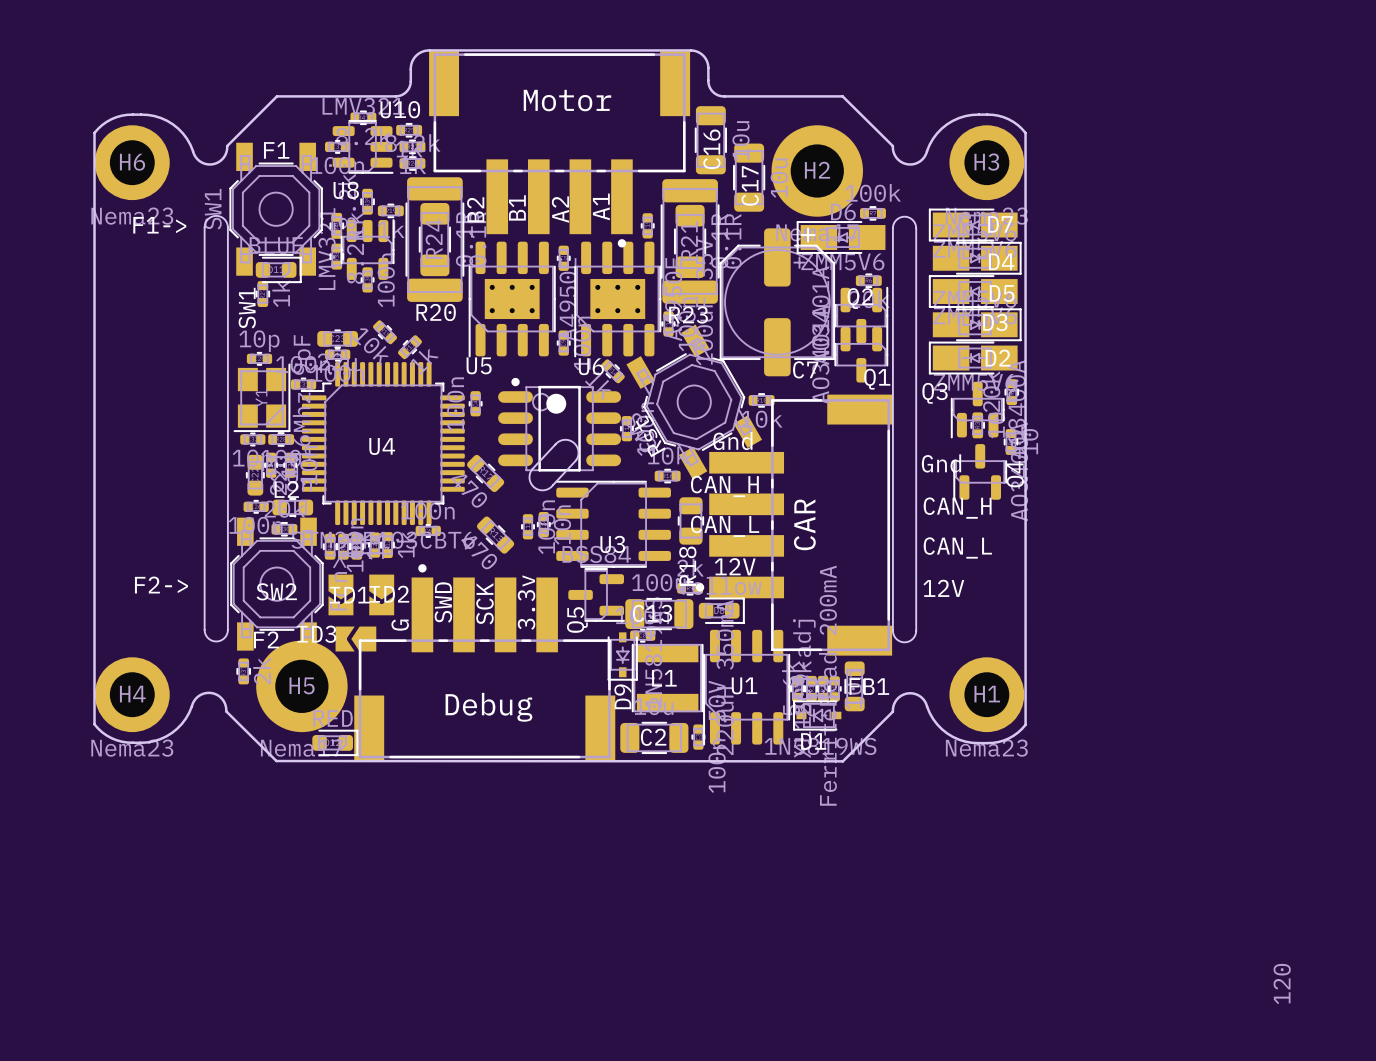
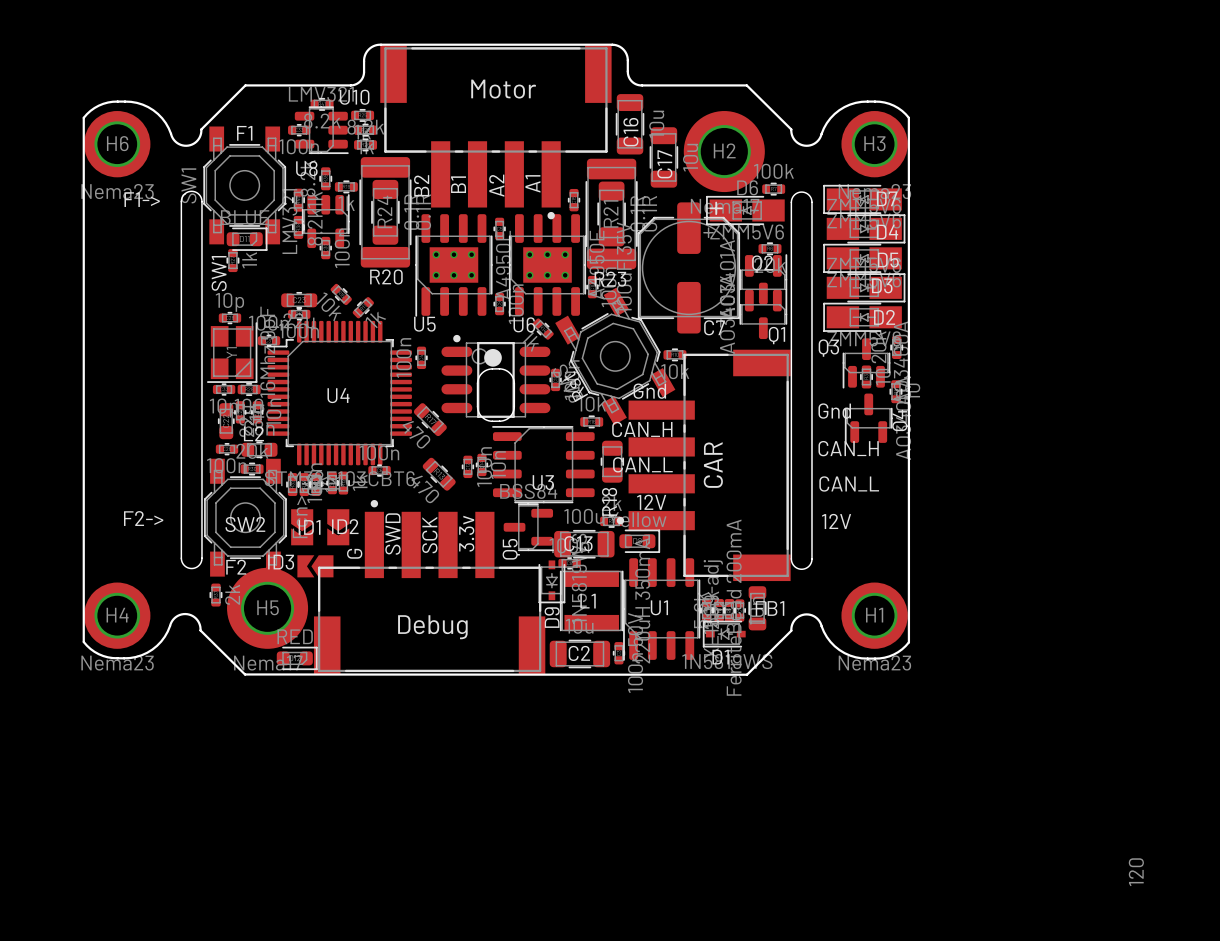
board edge: none -> (492, 368) (506, 370) (514, 381) (513, 411) (508, 417) (502, 420) (486, 420) (480, 415) (477, 408) (478, 378) (483, 372) (492, 368)
board edge: (555, 444) (530, 472) (530, 481) (537, 489) (543, 490) (550, 487) (577, 457) (578, 449) (571, 441) (562, 440) (555, 444) -> none

